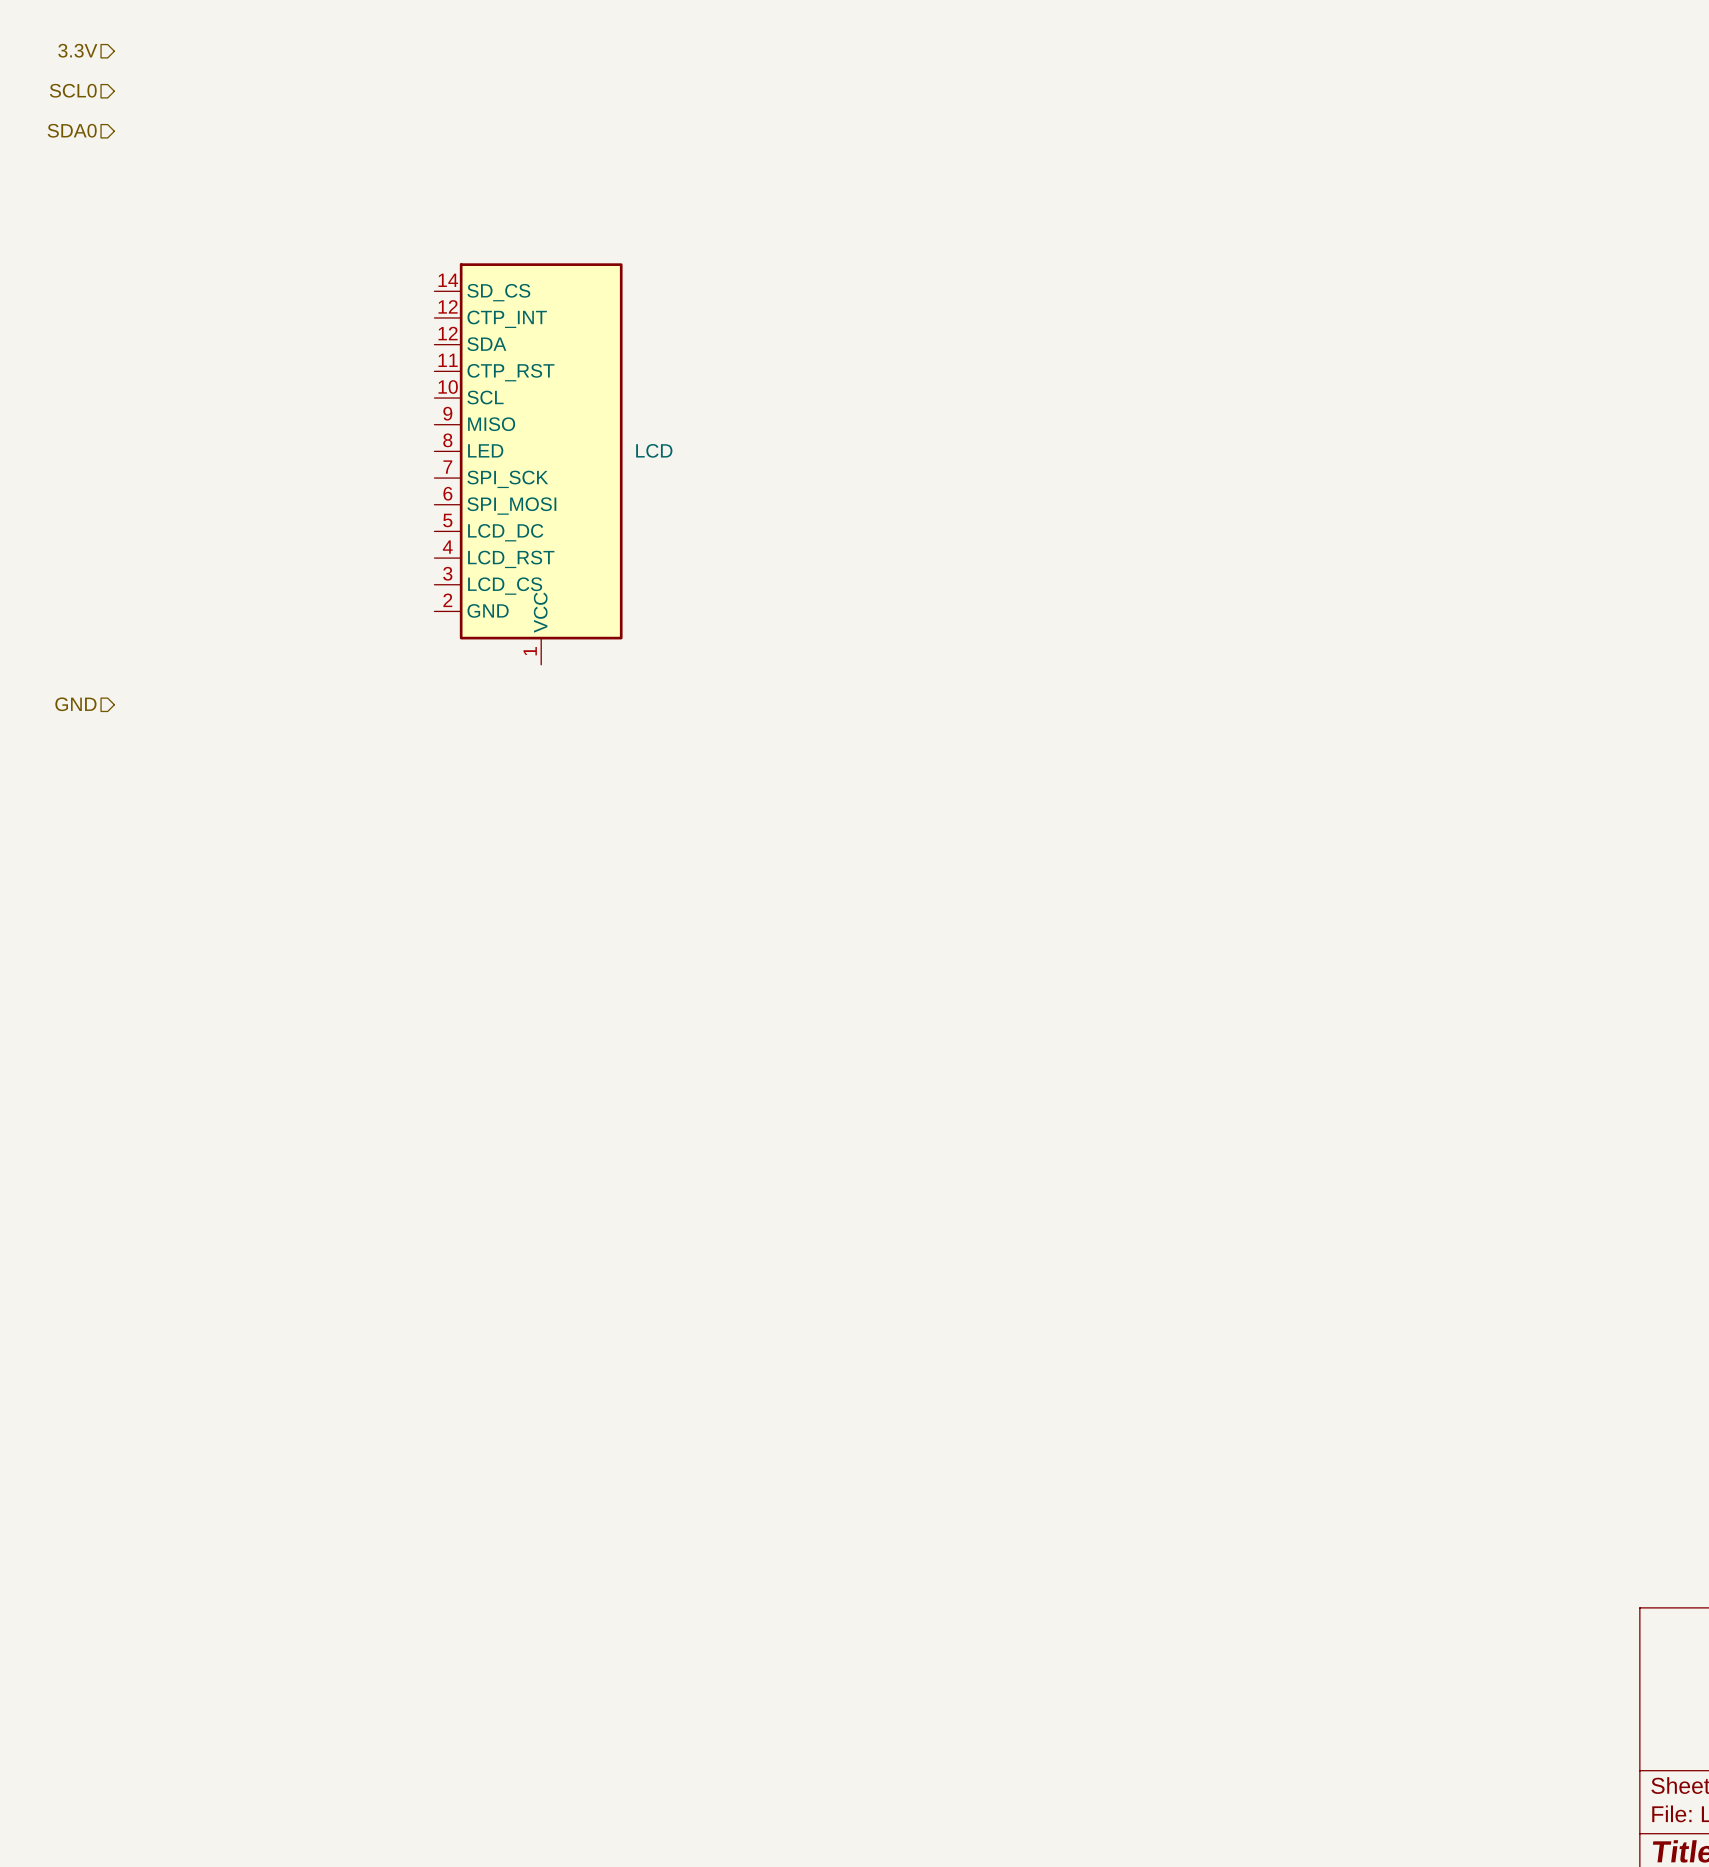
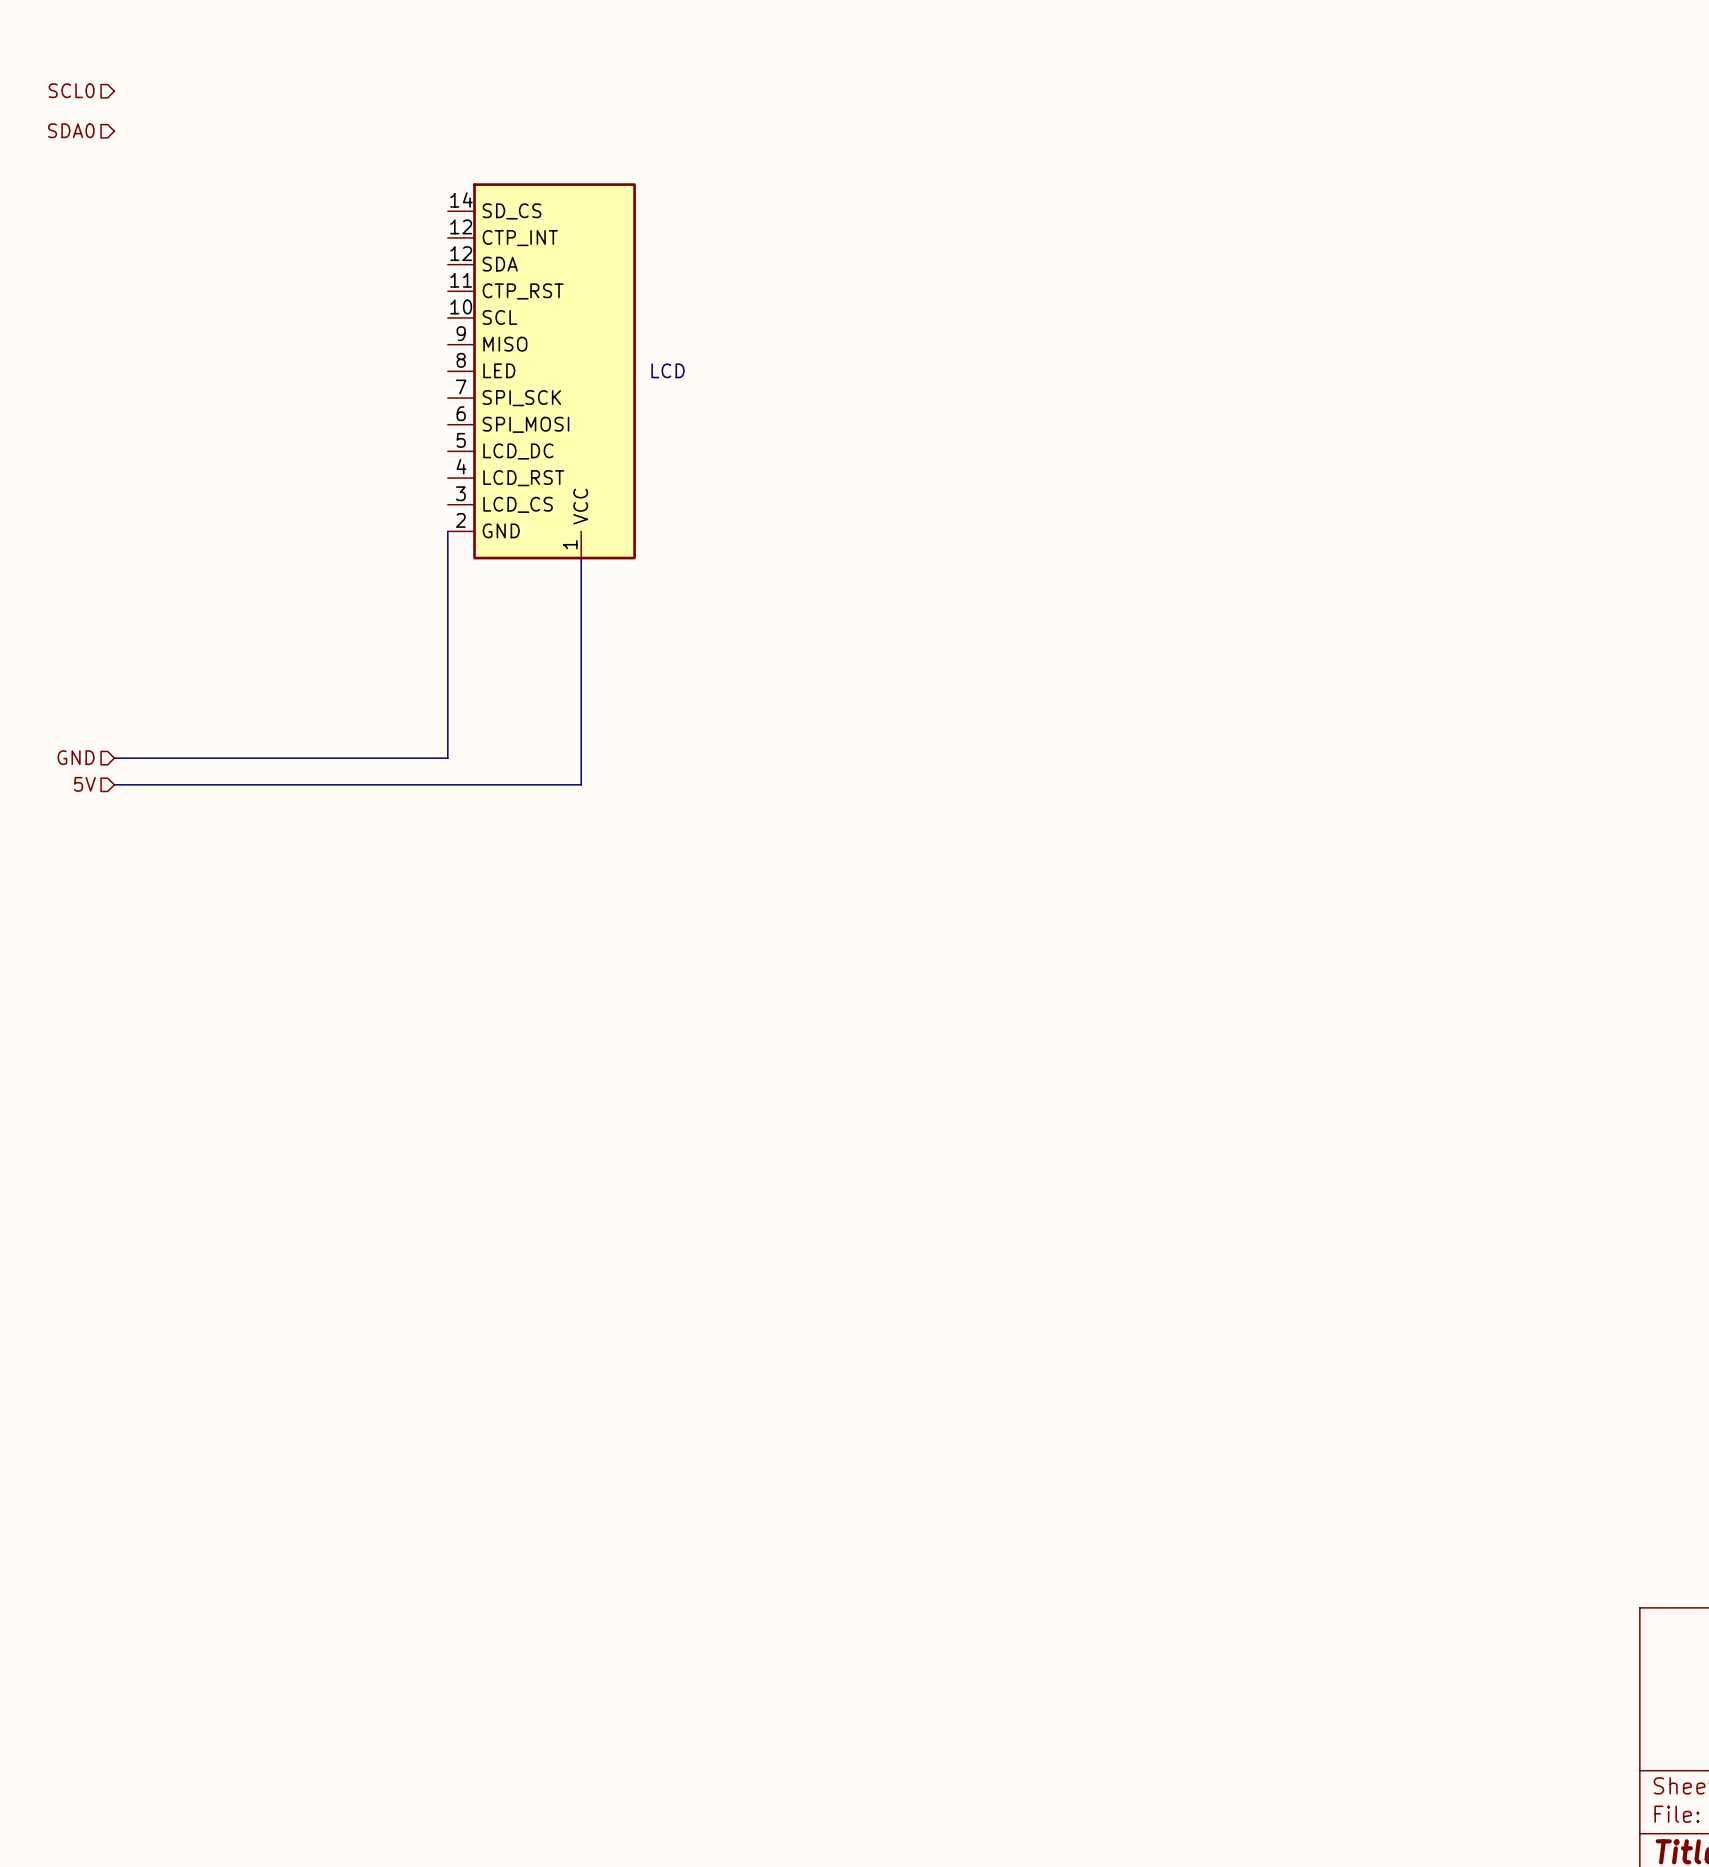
hierarchical label: 3.3V (77, 50) -> none
part: none -> LCD (541, 371)
part: LCD (528, 464) -> none
wire: none -> (447, 531) (447, 758) (114, 758)
wire: none -> (581, 558) (581, 784) (114, 784)
hierarchical label position: GND (75, 704) -> GND (76, 757)
hierarchical label: none -> 5V (84, 784)

